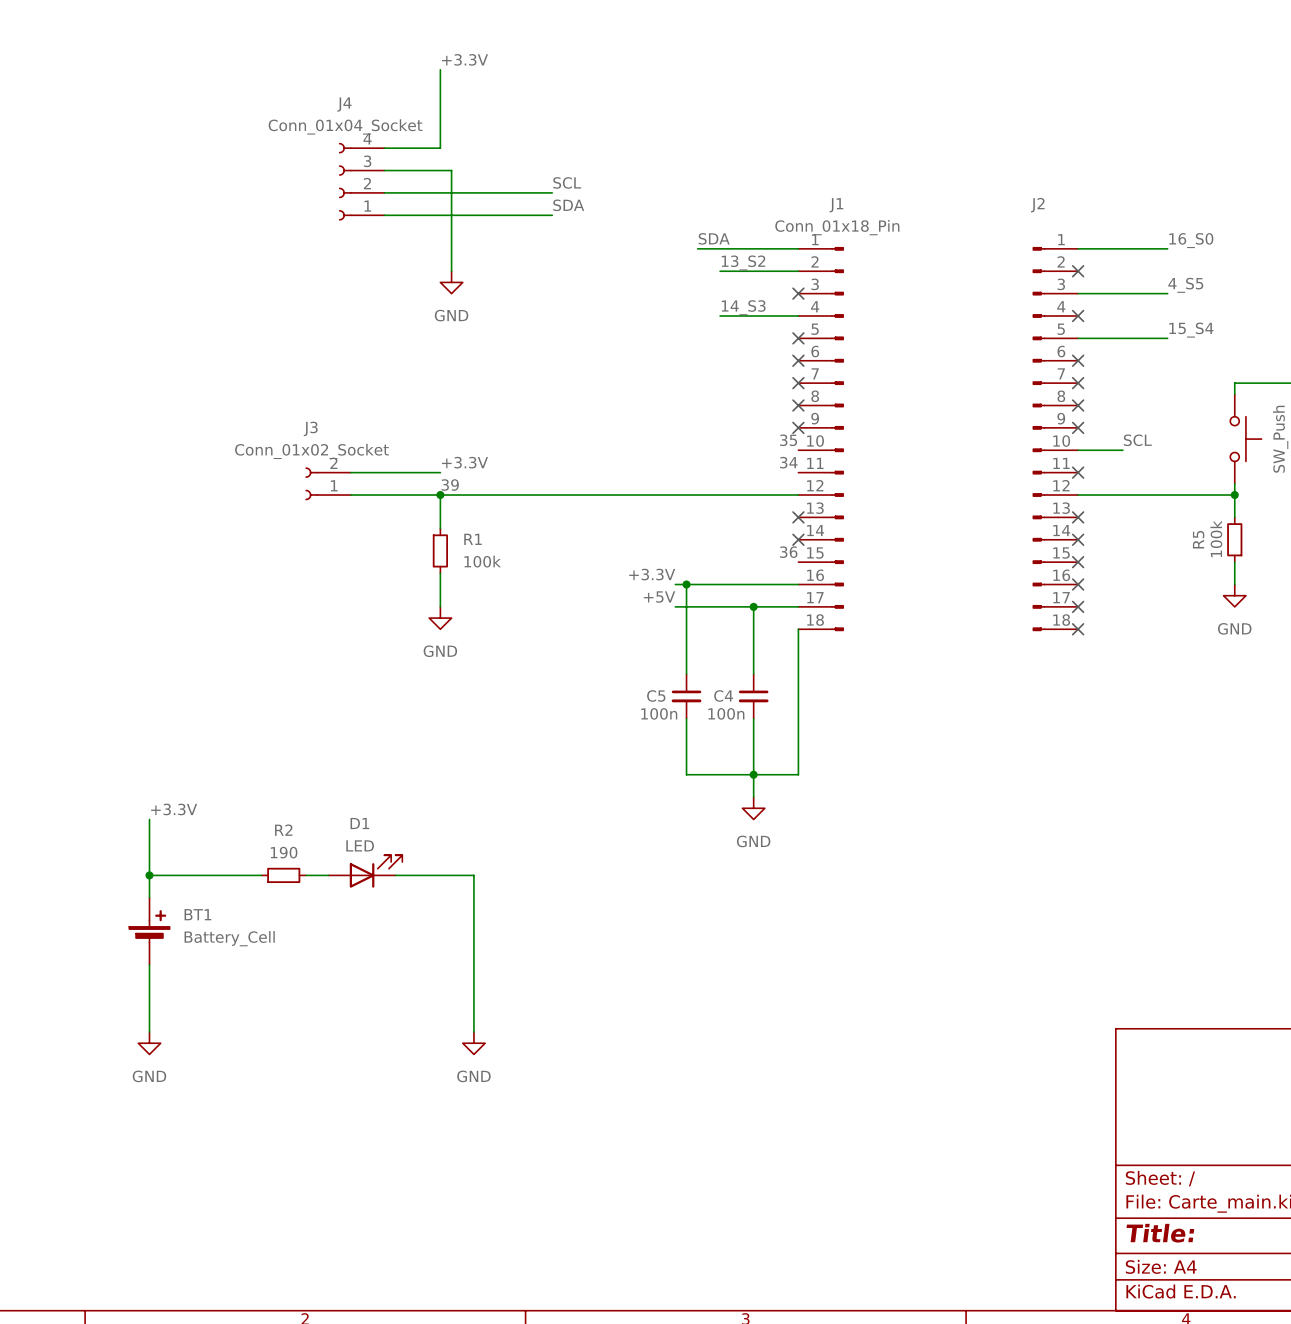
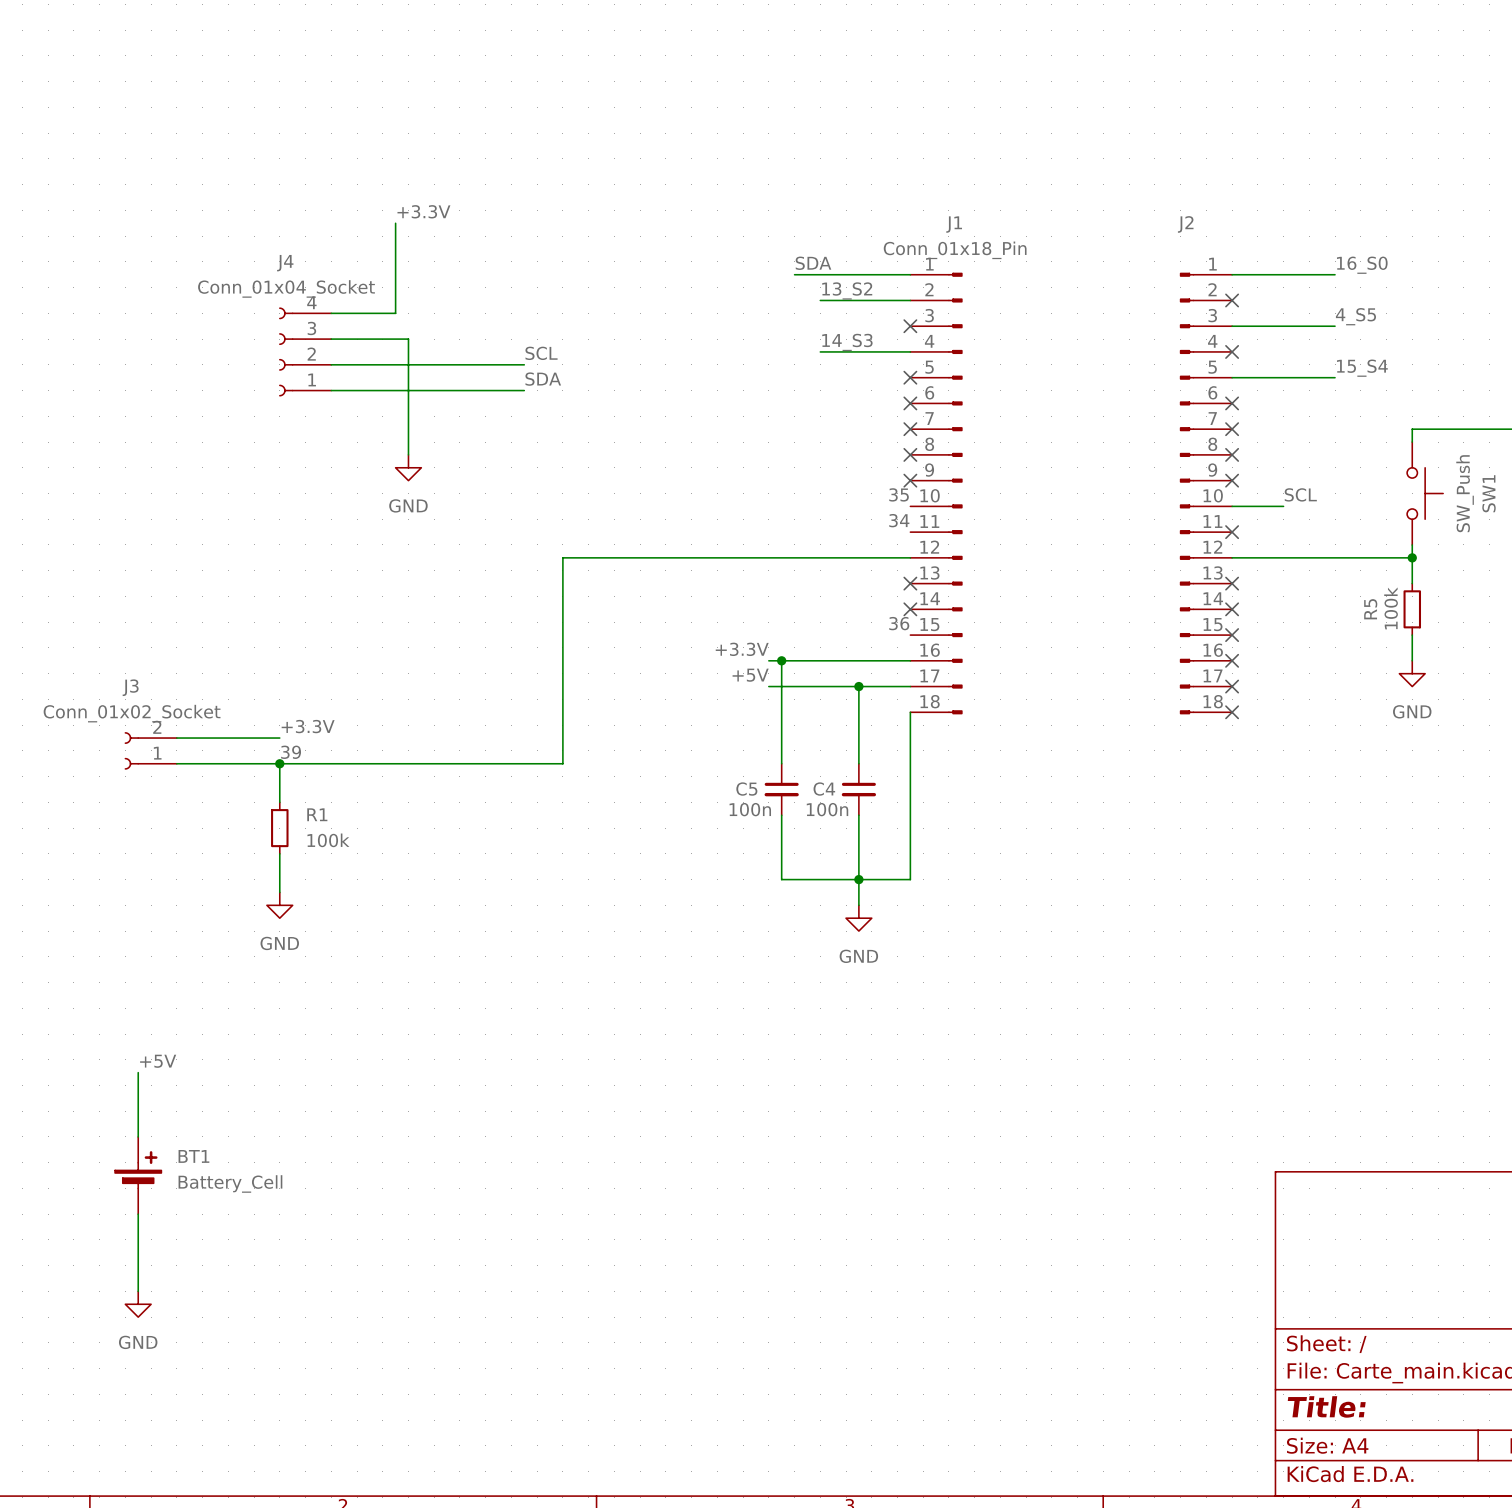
label: +3.3V (465, 59) -> none
wire: (440, 69) (440, 148) (384, 148) -> (395, 223) (395, 313) (331, 313)
wire: (384, 170) (451, 170) (451, 271) -> (331, 339) (408, 339) (408, 454)
J4 position: (361, 181) -> (305, 351)
label position: SCL (567, 182) -> SCL (541, 353)
wire: (384, 192) (552, 192) -> (331, 364) (524, 364)
label: none -> +3.3V (423, 211)
label position: SDA (568, 205) -> SDA (543, 379)
wire: (384, 215) (552, 215) -> (331, 390) (524, 390)
power symbol: GND (451, 282) -> none
power symbol: none -> GND (408, 467)
label: +3.3V (465, 462) -> none
wire: (350, 472) (440, 472) -> none
J3 position: (328, 483) -> (150, 750)
label: 39 (450, 485) -> none
wire: (350, 495) (496, 495) -> (176, 763) (562, 763) (562, 557)
wire: (440, 495) (440, 528) -> none
junction: (440, 495) -> none
R1 position: (440, 550) -> (279, 828)
wire: (440, 573) (440, 606) -> (279, 763) (279, 802)
power symbol: GND (440, 618) -> none
label: none -> +3.3V (308, 726)
wire: none -> (176, 738) (279, 738)
label: none -> 39 (291, 752)
junction: none -> (279, 763)
wire: none -> (279, 853) (279, 892)
power symbol: none -> GND (279, 905)
label: +3.3V (174, 809) -> none
wire: (149, 819) (149, 897) -> none
D1: LED (365, 871) -> none
wire: (149, 875) (261, 875) -> none
junction: (149, 875) -> none
R2: 190 (283, 875) -> none
wire: (306, 875) (328, 875) -> none
wire: (395, 875) (473, 875) (473, 1032) -> none
BT1 position: (149, 931) -> (138, 1175)
label: none -> +5V (158, 1061)
wire: none -> (138, 1072) (138, 1136)
wire: (149, 964) (149, 1032) -> (138, 1214) (138, 1291)
power symbol position: GND (149, 1043) -> GND (138, 1304)
power symbol: GND (473, 1043) -> none

